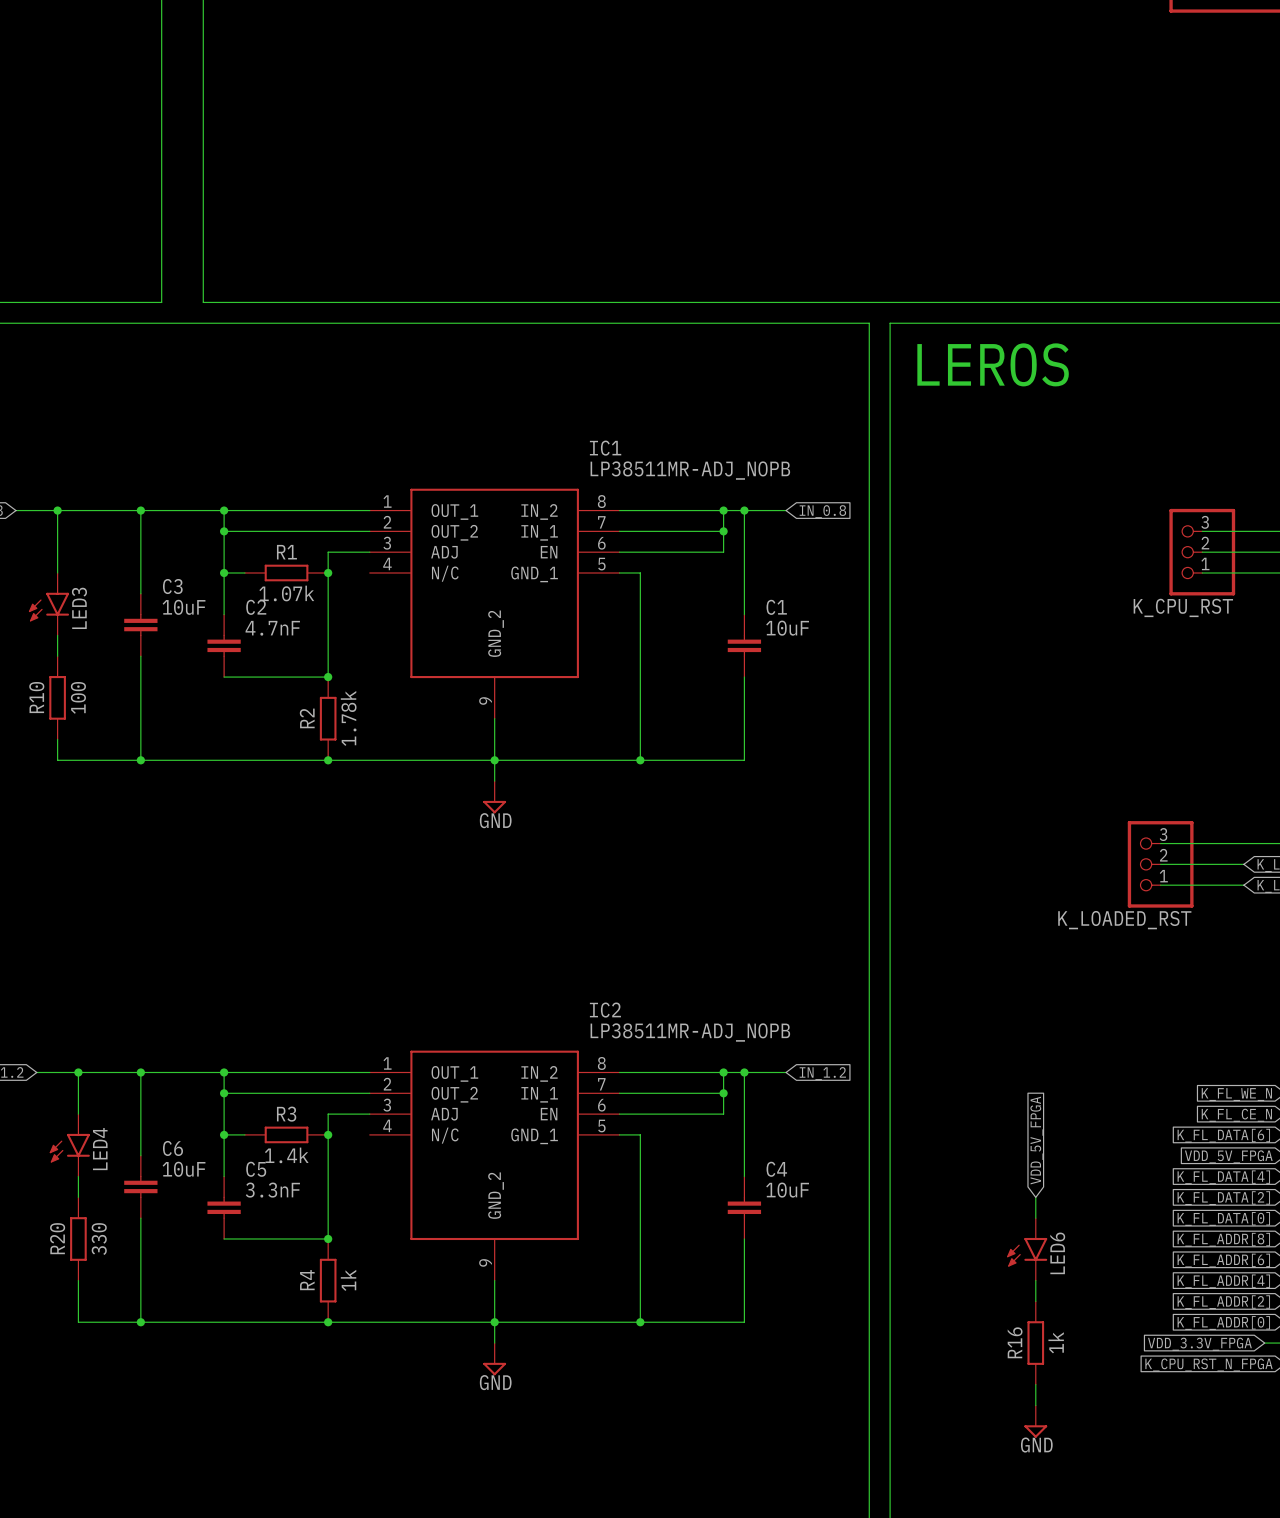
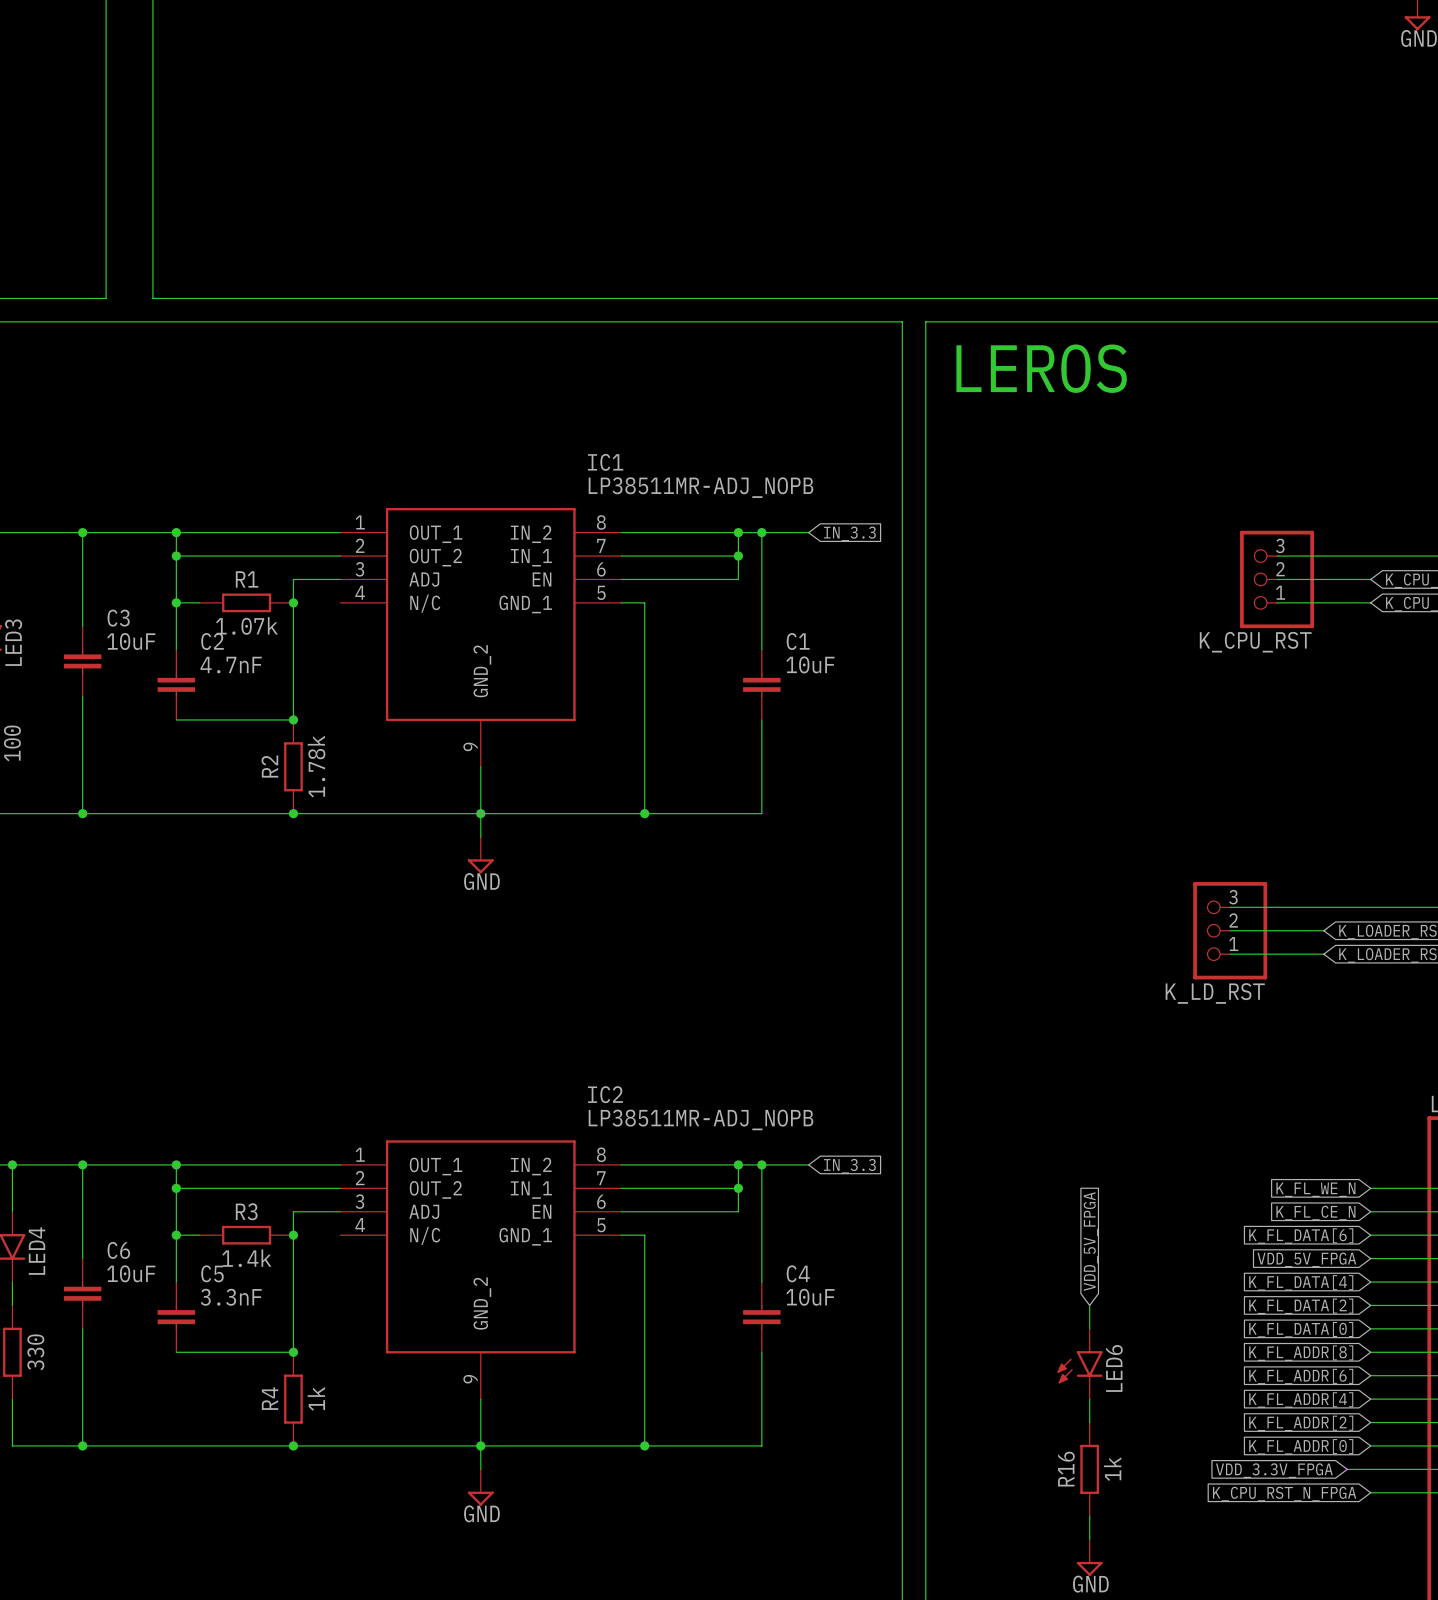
global label: IN_0.8 (822, 511) -> IN_3.3 (849, 533)
K_LOADED_RST name: K_LOADED_RST (1124, 920) -> K_LD_RST (1215, 993)
global label: IN_1.2 (822, 1073) -> IN_3.3 (849, 1166)

